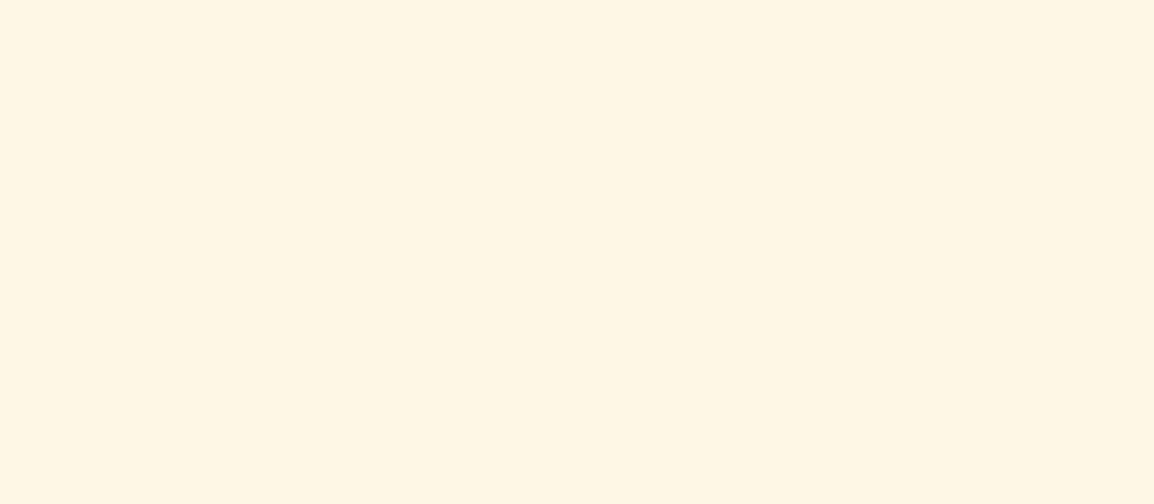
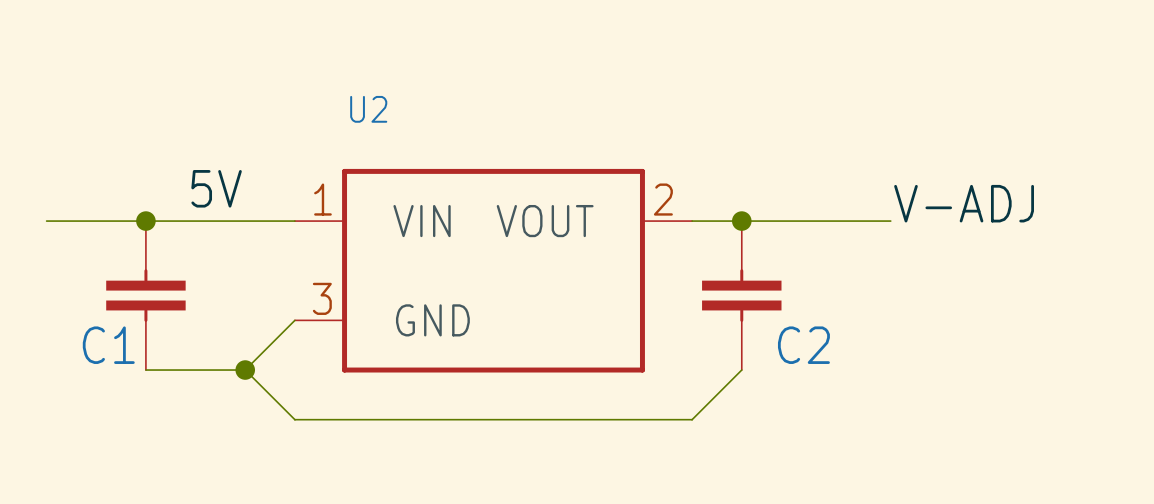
label: none -> 5V (216, 188)
label: none -> V-ADJ (964, 203)
wire: none -> (46, 221) (294, 221)
junction: none -> (145, 221)
wire: none -> (692, 221) (890, 221)
junction: none -> (741, 221)
U2: none -> (493, 270)
C1: none -> (145, 295)
C2: none -> (741, 295)
wire: none -> (294, 320) (245, 370)
wire: none -> (145, 370) (245, 370)
wire: none -> (245, 370) (294, 419) (692, 419) (741, 370)
junction: none -> (245, 370)

